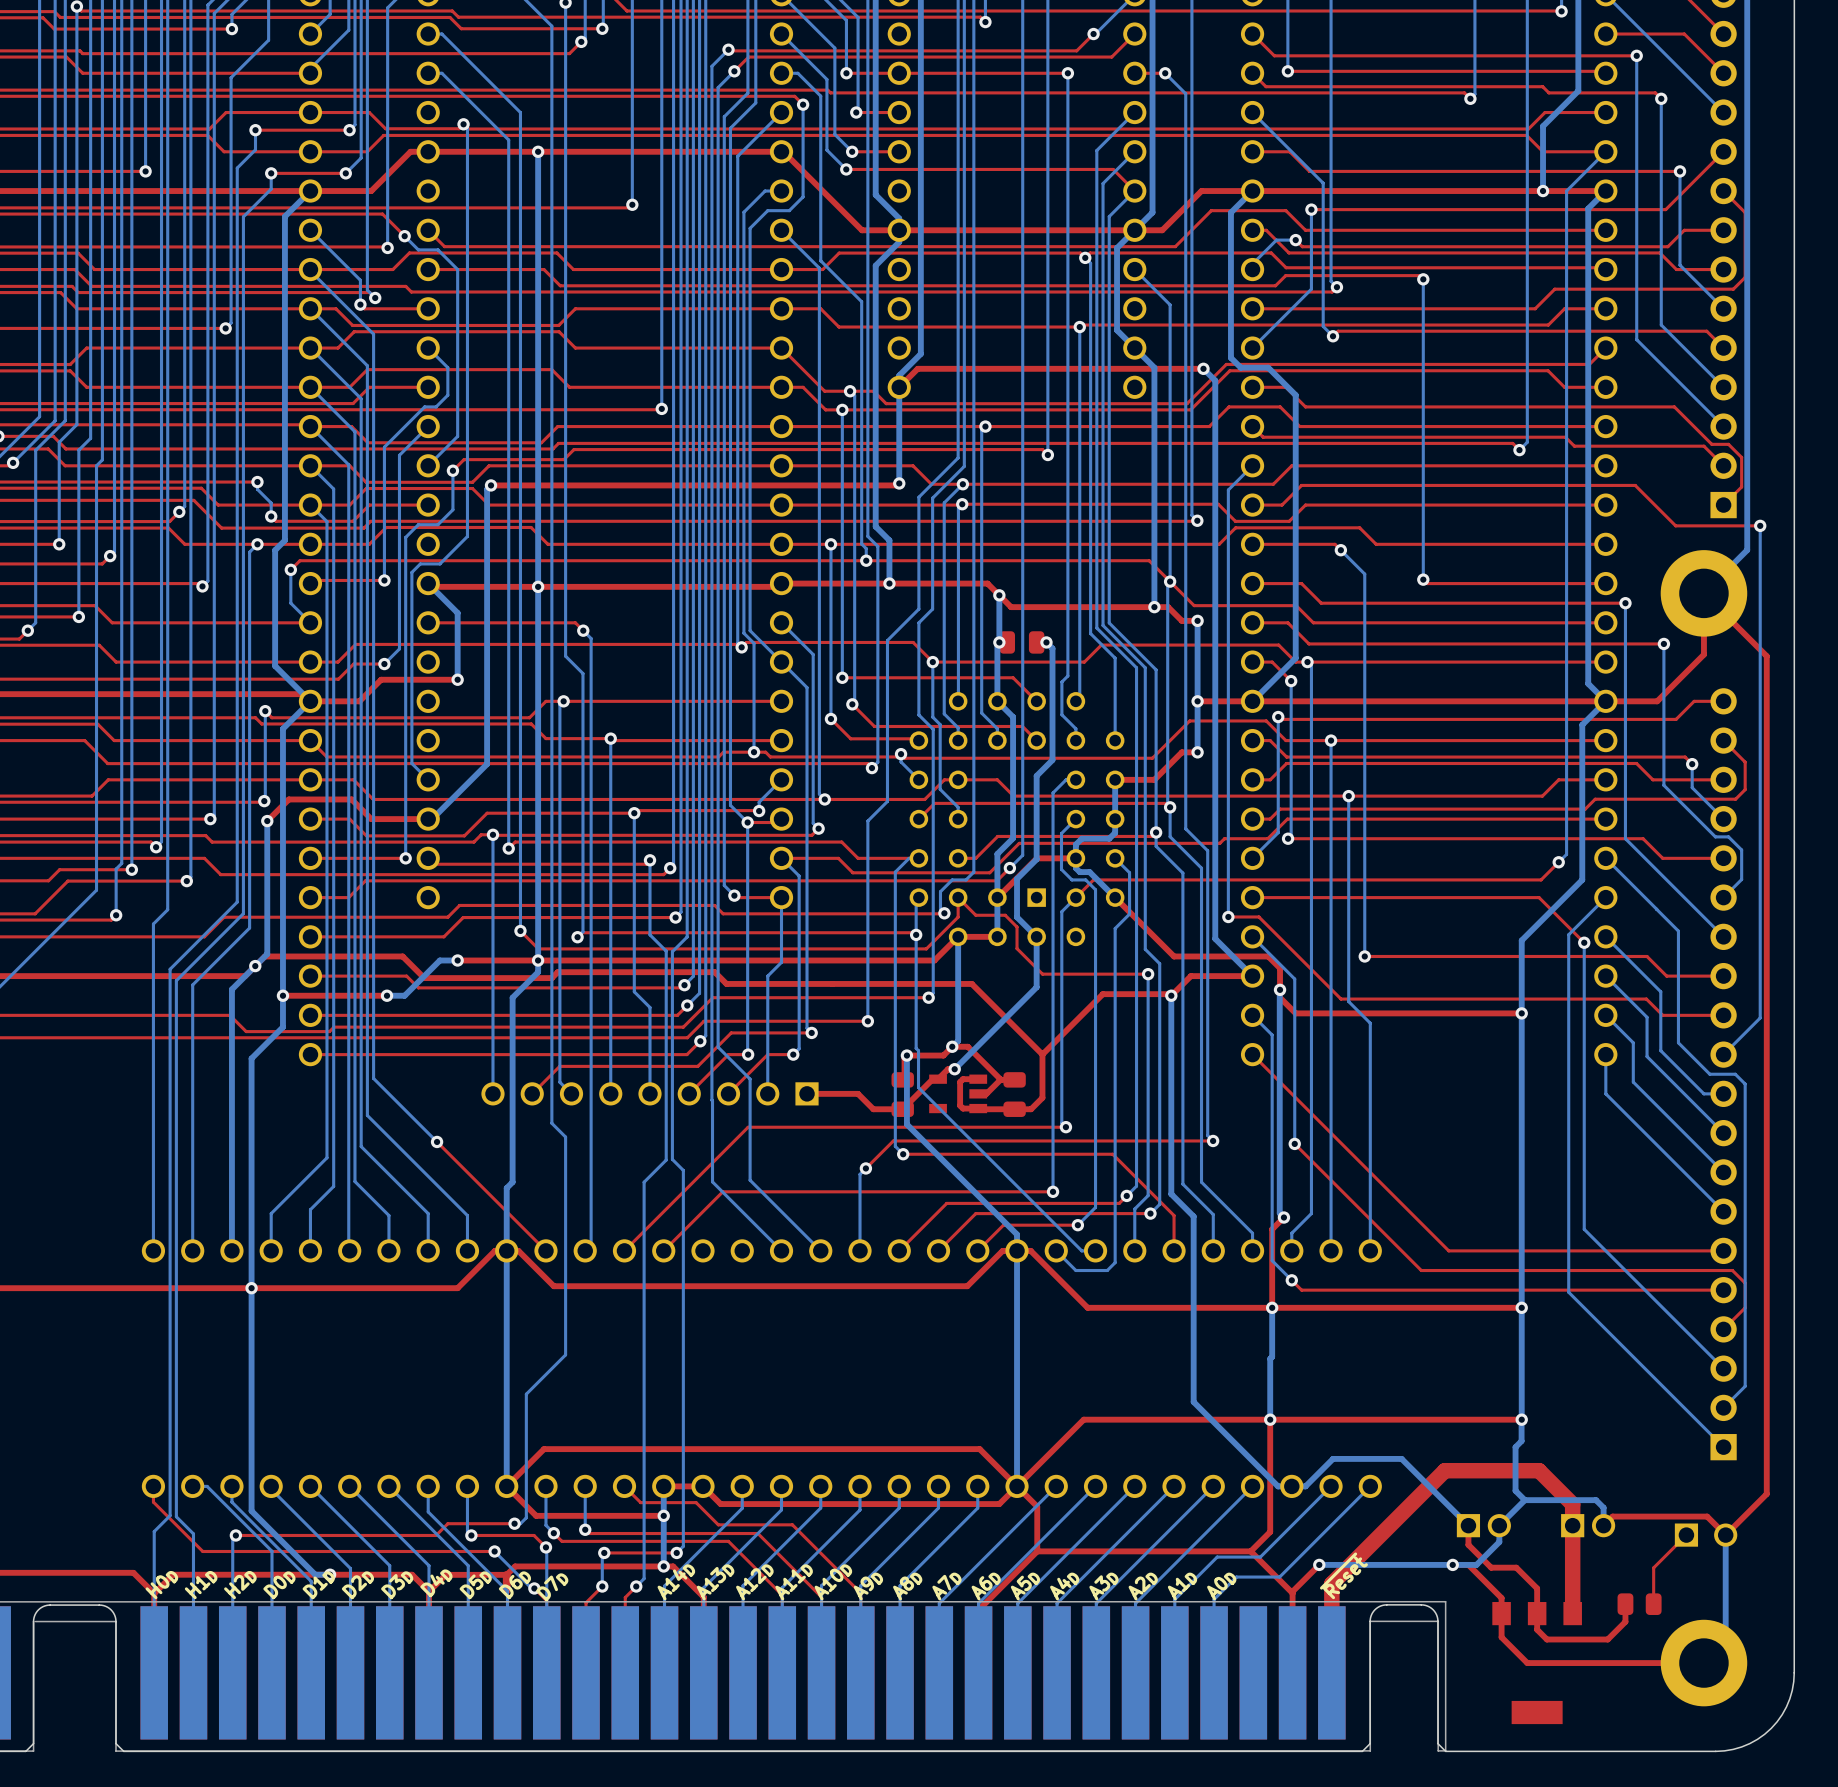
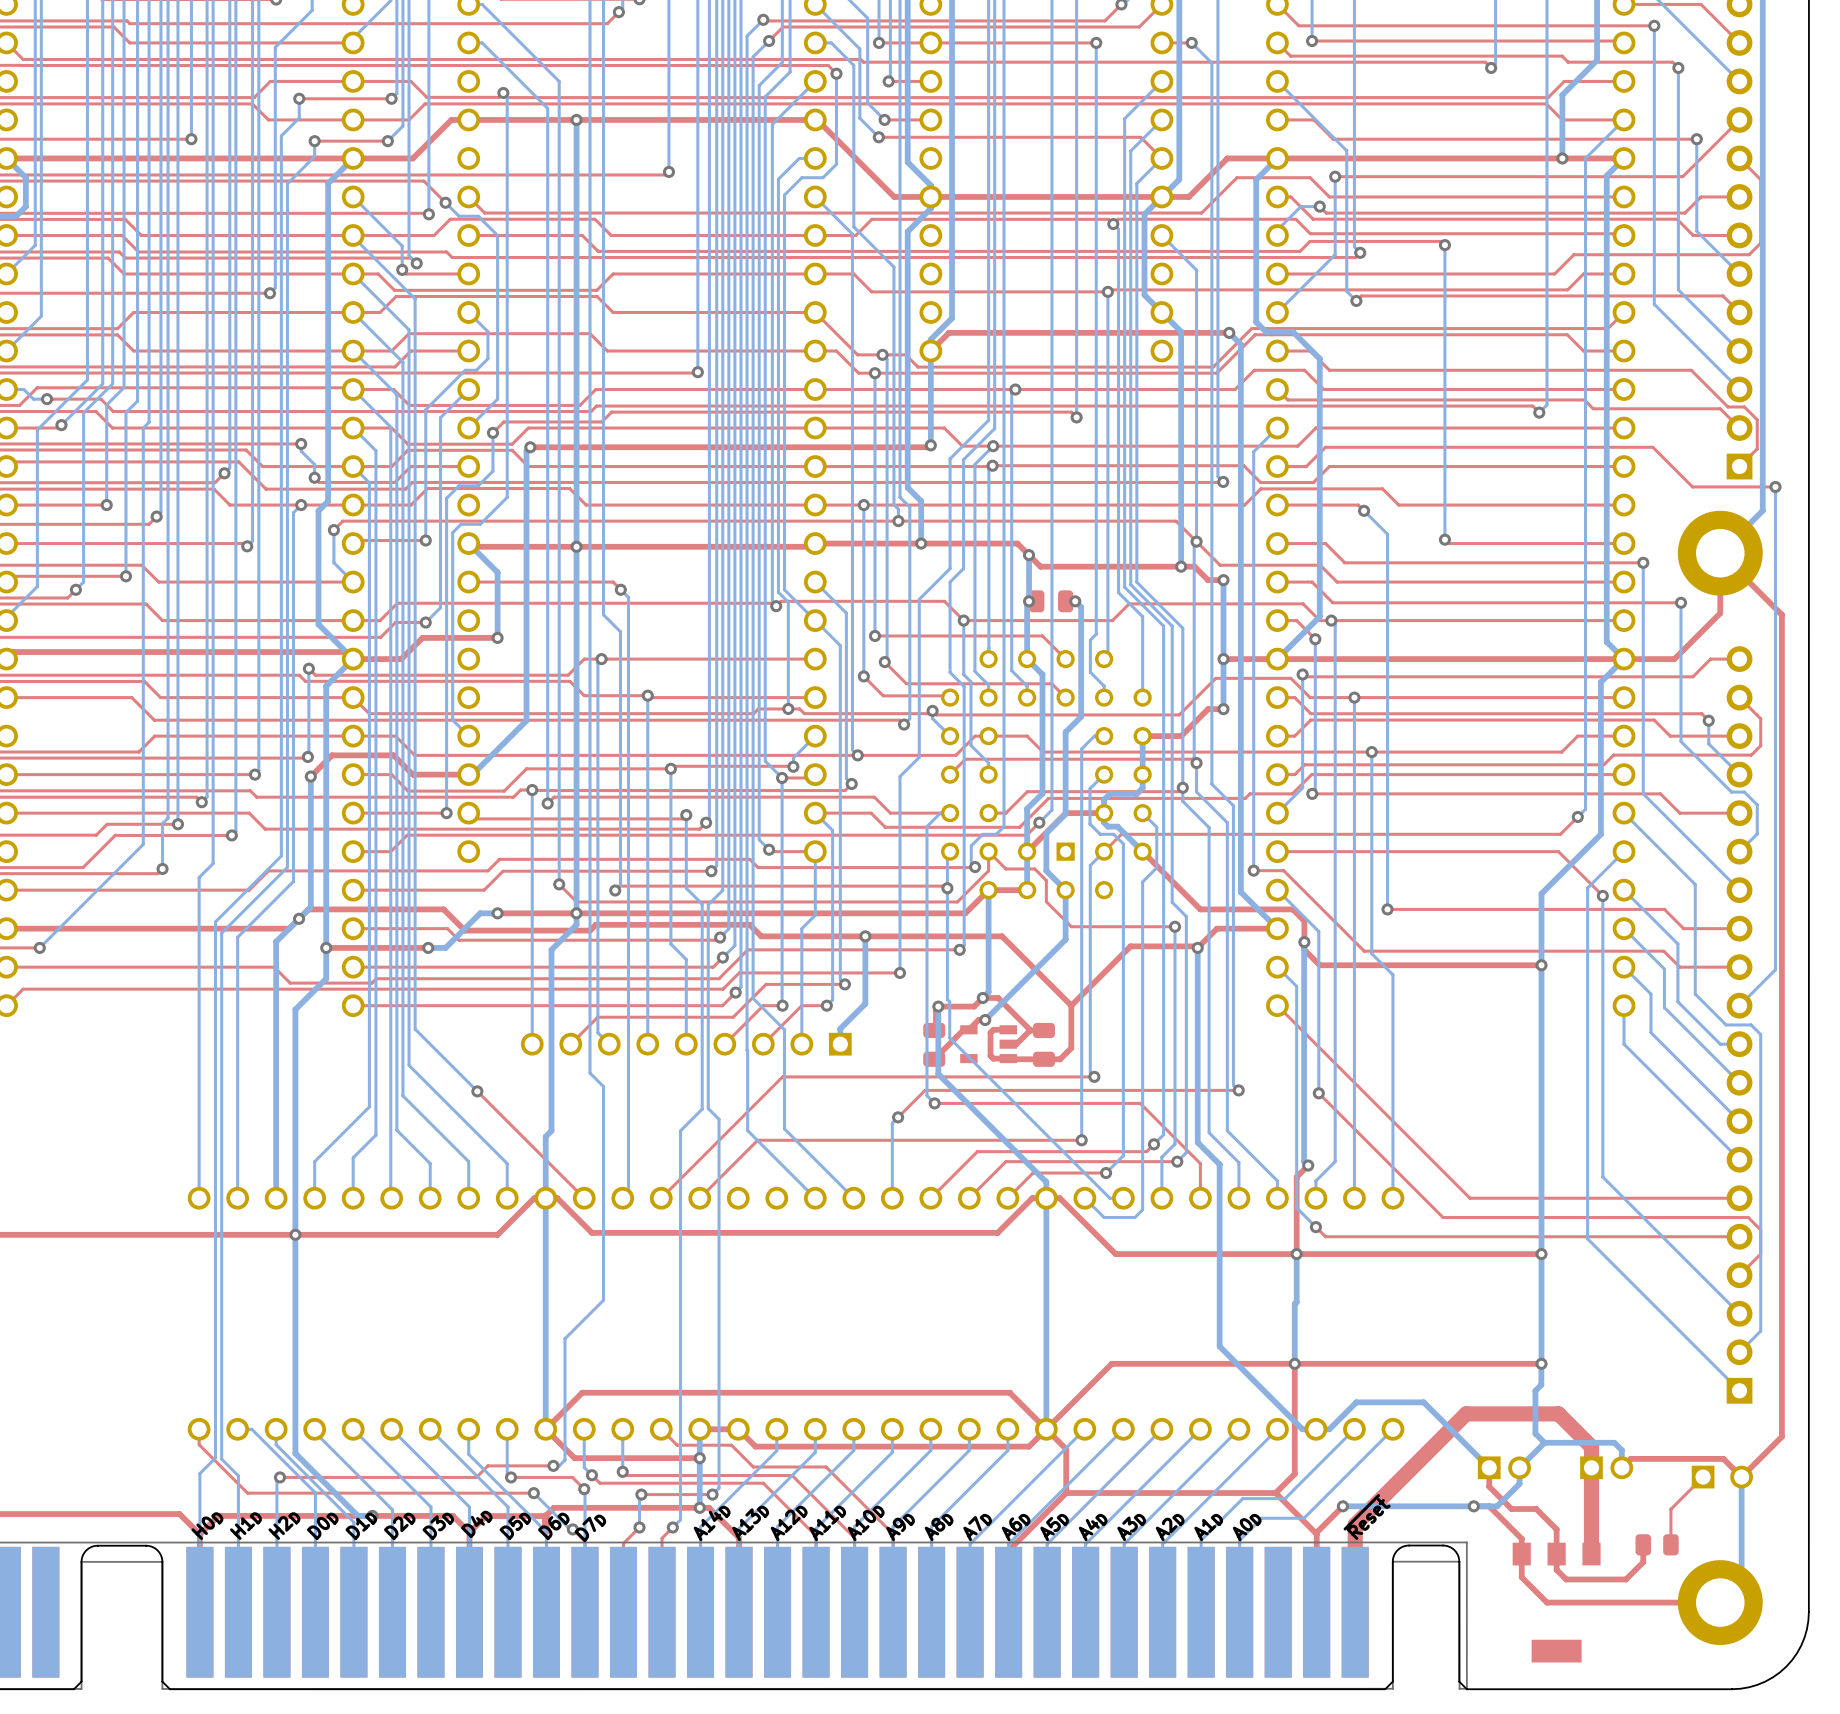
bottom track: none -> (865, 936) (865, 1003) (840, 1028) (840, 1044)
via: none -> (865, 936)
top track: (807, 1093) (858, 1093) (873, 1109) (902, 1109) -> none

